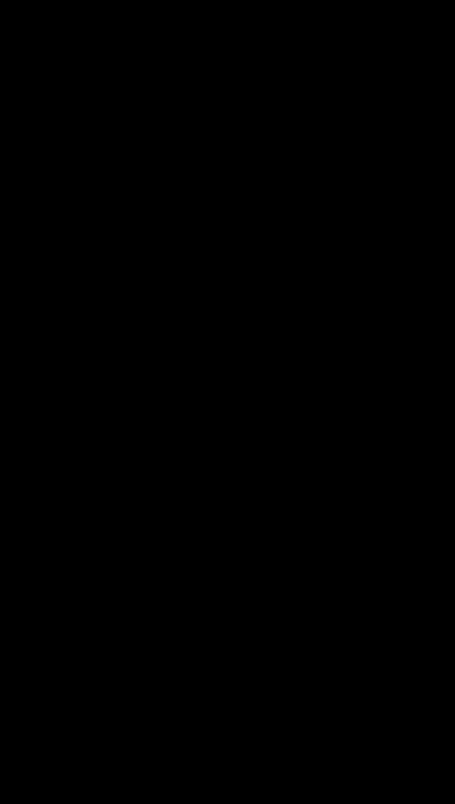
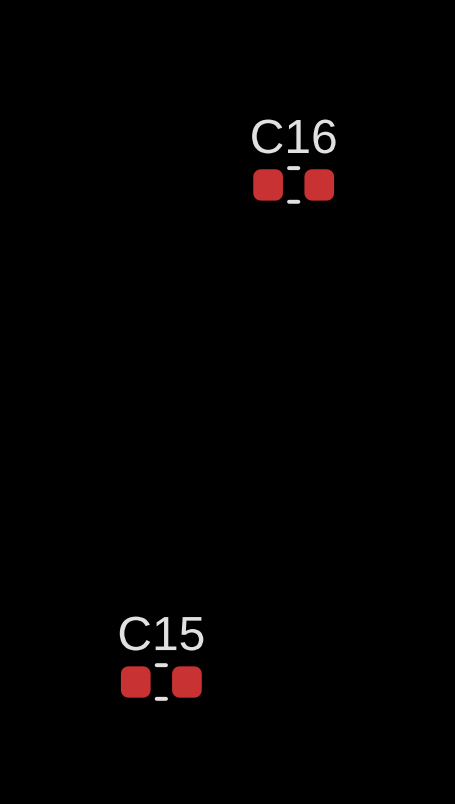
C16: none -> (293, 184)
C15: none -> (161, 682)

